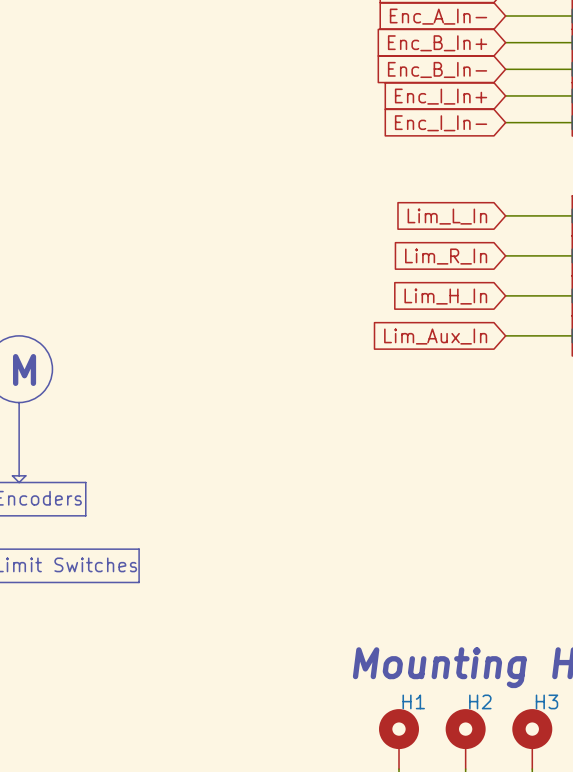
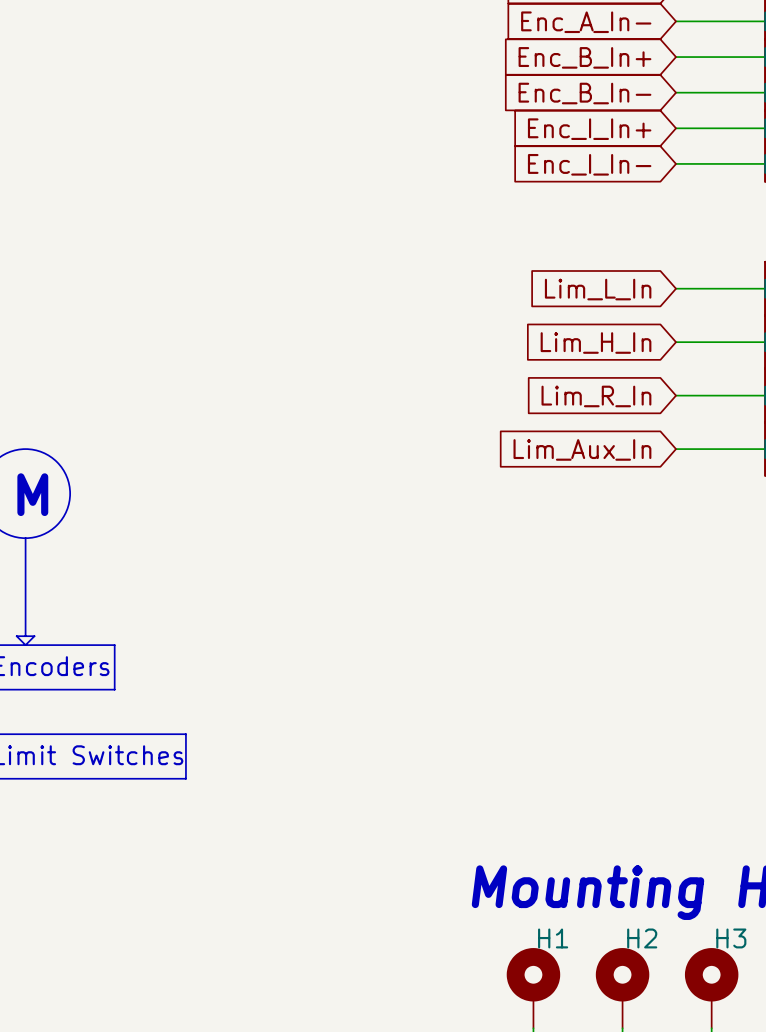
global label: Lim_R_In (446, 256) -> Lim_H_In (596, 343)
global label: Lim_H_In (445, 296) -> Lim_R_In (596, 396)

